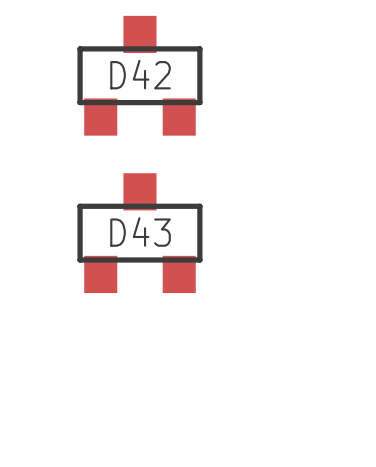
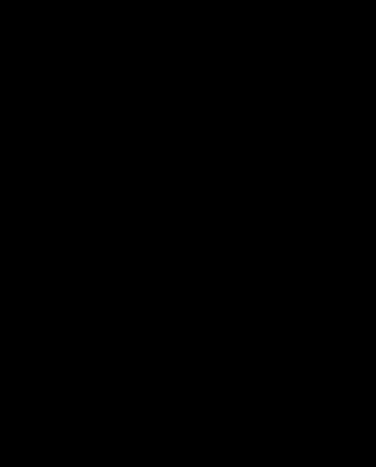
D42: (139, 75) -> none
D43: (139, 233) -> none

